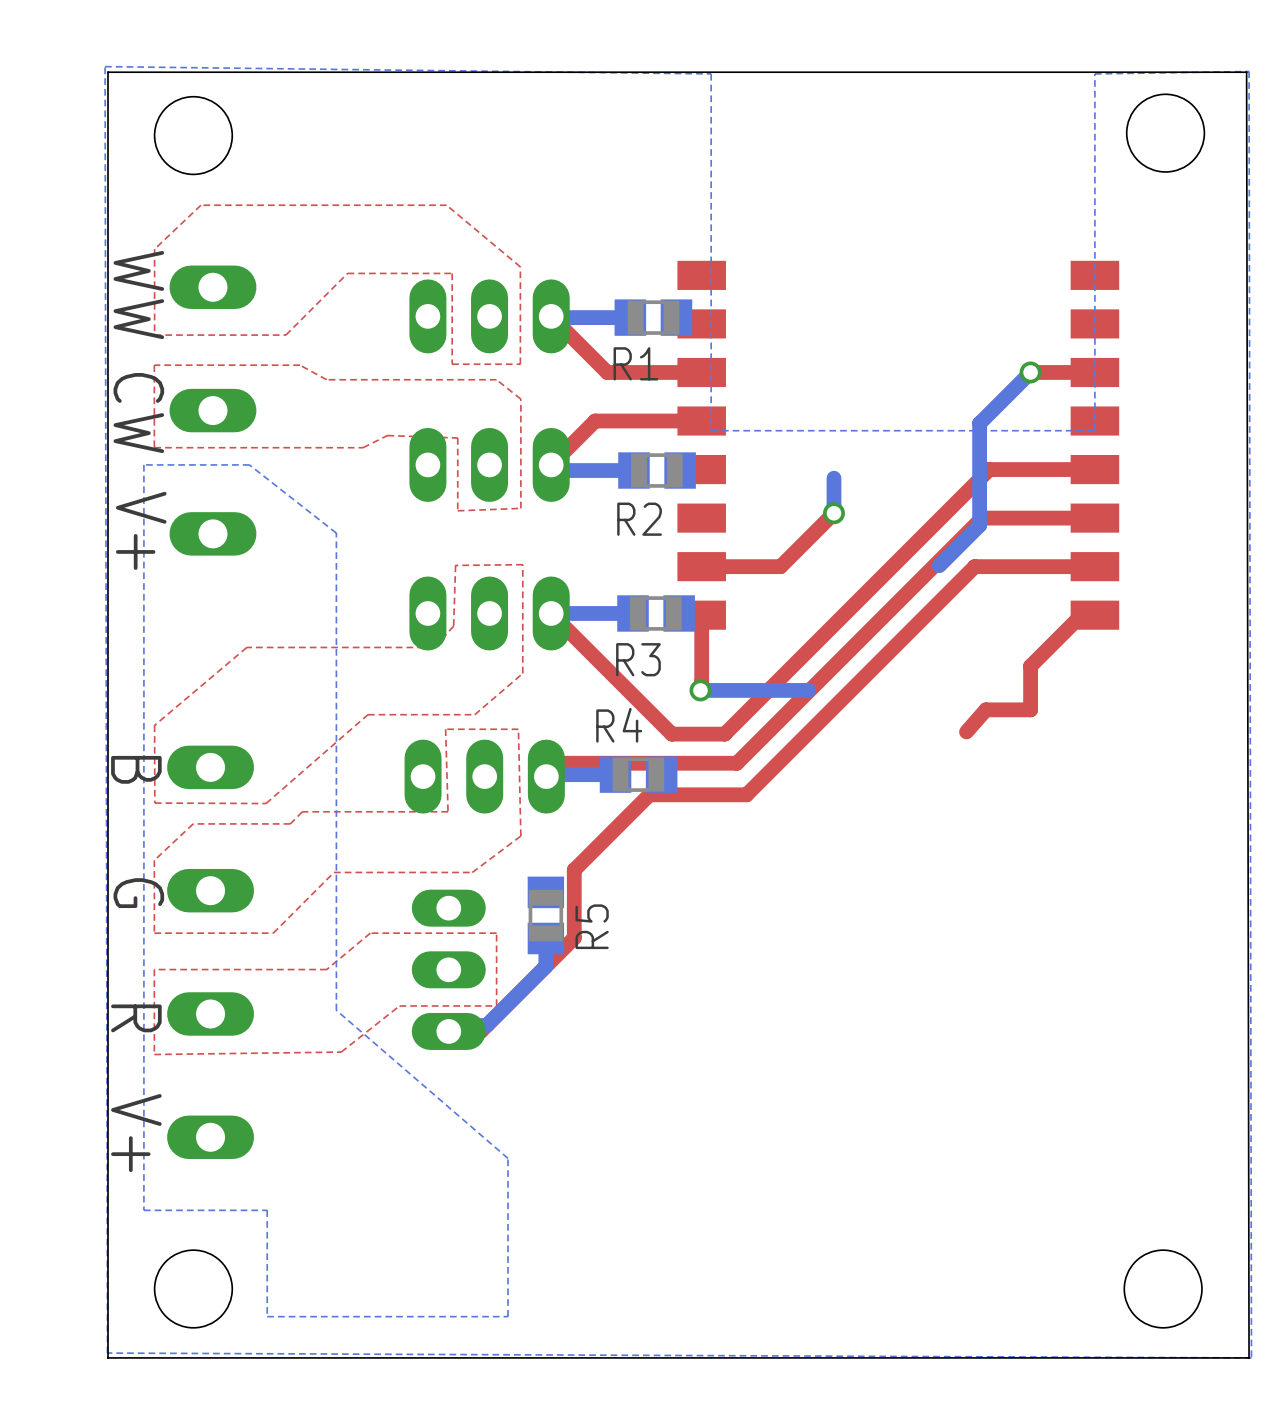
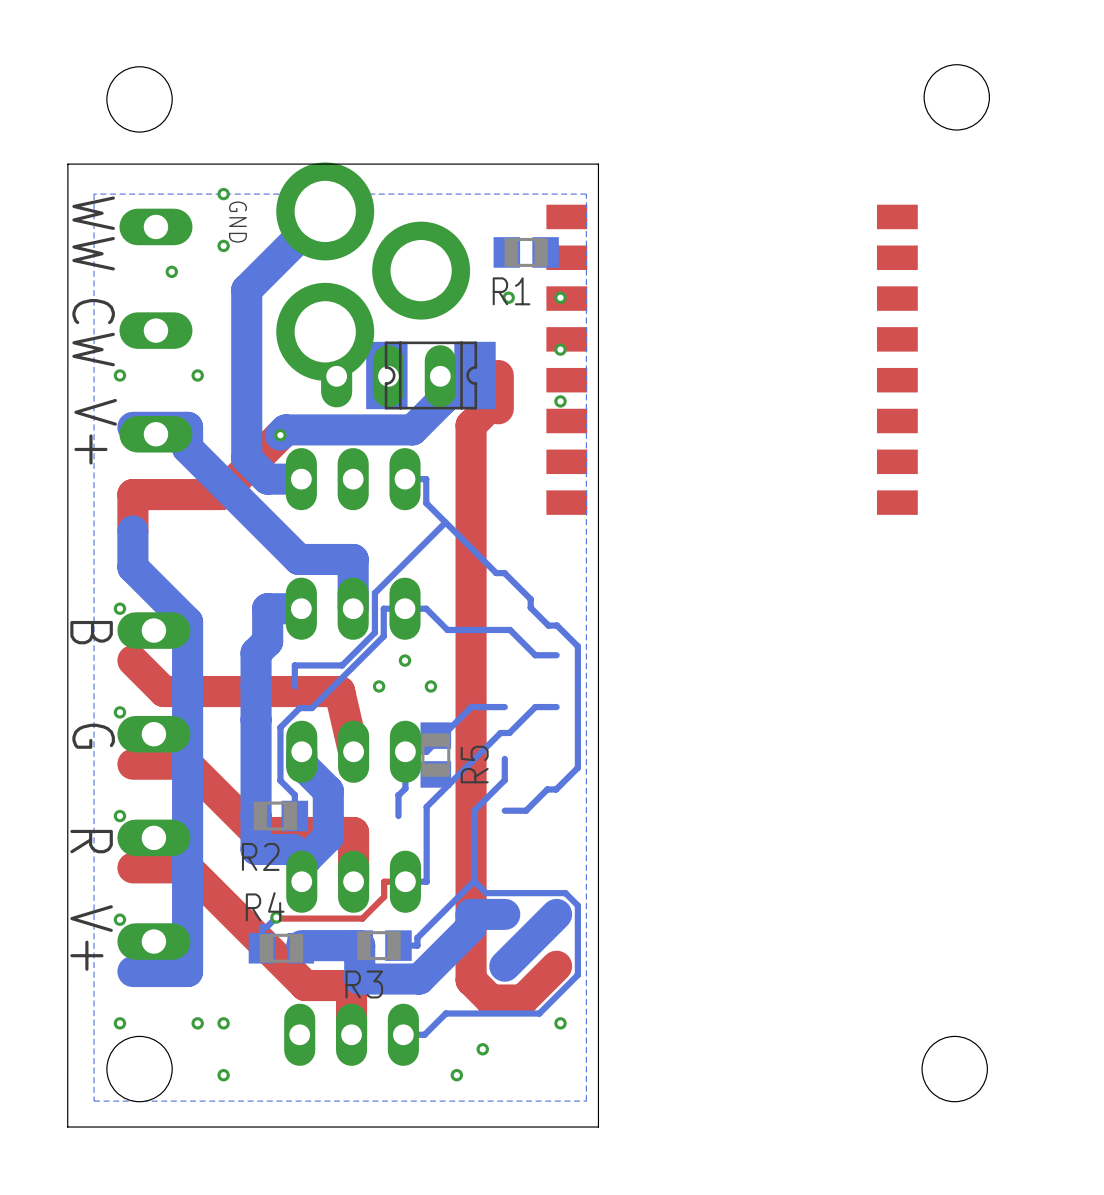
bottom zone outline: (105, 66) (107, 1353) (1251, 1357) (1249, 71) (1094, 73) (1094, 430) (711, 430) (711, 73) (105, 66) -> none
top zone outline: (446, 205) (520, 266) (520, 364) (452, 364) (452, 273) (347, 273) (285, 335) (154, 335) (154, 249) (200, 205) (446, 205) -> none
board edge: (108, 212) (108, 72) (1246, 72) (1249, 1357) (739, 1357) -> (67, 164) (598, 164) (598, 1127)
via: none -> (223, 194)
bottom zone outline: none -> (586, 194) (586, 1101) (94, 1101) (94, 194) (586, 194)
bottom track: none -> (325, 211) (246, 289) (246, 458) (267, 479) (301, 479)
text: none -> GND (237, 222)
via: none -> (223, 245)
part: (489, 316) -> none
bottom track: (551, 316) (630, 317) -> none
top track: (551, 316) (607, 372) (701, 372) -> none
via: none -> (171, 271)
part: none -> (373, 271)
top zone outline: (299, 365) (326, 379) (496, 379) (520, 399) (520, 508) (457, 510) (457, 438) (387, 435) (363, 447) (154, 447) (154, 365) (299, 365) -> none
via: none -> (508, 297)
via: none -> (560, 297)
bottom track: (1030, 372) (979, 423) (979, 525) (939, 565) -> none
via: (1030, 372) -> none
top track: (1094, 372) (1030, 372) -> none
top track: (701, 421) (595, 421) (551, 464) -> none
via: none -> (560, 349)
via: none -> (119, 375)
via: none -> (197, 375)
part: none -> (430, 375)
bottom track: none -> (475, 375) (442, 375) (442, 399) (412, 429) (285, 429) (280, 435)
top track: none -> (498, 375) (498, 408) (487, 408) (471, 425) (471, 980) (490, 1000) (522, 1000) (556, 966)
bottom zone outline: (249, 464) (336, 533) (336, 1010) (508, 1158) (508, 1316) (267, 1316) (267, 1210) (143, 1210) (143, 464) (249, 464) -> none
bottom track: (551, 464) (556, 470) (633, 470) -> none
top track: (1094, 469) (989, 469) (724, 734) (671, 734) (551, 613) -> none
R2 position: (657, 470) -> (275, 816)
bottom track: (833, 478) (833, 513) -> none
via: none -> (560, 401)
top track: (833, 513) (780, 566) (701, 566) -> none
via: (833, 513) -> none
top track: (1094, 518) (982, 518) (736, 763) (559, 763) (546, 776) -> none
bottom track: none -> (132, 427) (187, 427) (187, 448) (298, 559) (353, 559) (353, 608)
top track: none -> (280, 435) (221, 494) (132, 494) (132, 530)
via: none -> (280, 435)
top zone outline: (522, 564) (522, 673) (474, 714) (367, 714) (266, 803) (154, 803) (154, 725) (246, 647) (434, 647) (453, 626) (455, 565) (522, 564) -> none
top track: (1094, 566) (974, 566) (746, 794) (649, 794) (574, 870) (574, 938) (480, 1031) (448, 1031) -> none
bottom track: none -> (405, 479) (426, 479) (426, 503) (496, 573) (504, 573) (530, 599) (530, 607) (548, 625) (557, 625) (577, 646) (577, 767) (556, 789) (547, 789) (526, 810) (504, 810)
part position: (489, 613) -> (353, 479)
bottom track: (633, 613) (551, 613) -> none
R3 position: (656, 613) -> (379, 945)
top track: (701, 615) (700, 690) -> none
top track: (1094, 615) (1081, 615) (1030, 666) (1030, 709) (985, 709) (966, 731) -> none
bottom track: none -> (445, 522) (374, 593) (374, 632) (342, 665) (294, 665) (294, 686)
bottom track: none -> (132, 530) (132, 567) (187, 622) (187, 971) (132, 971)
via: (700, 690) -> none
bottom track: (808, 690) (700, 690) -> none
top zone outline: (518, 729) (445, 729) (448, 811) (302, 811) (290, 823) (193, 823) (154, 860) (154, 933) (273, 933) (333, 872) (472, 872) (520, 836) (518, 729) -> none
via: none -> (119, 608)
bottom track: none -> (301, 608) (267, 608) (267, 641) (256, 653) (256, 849) (292, 849) (301, 858) (306, 858) (328, 836) (328, 791) (301, 764) (301, 751)
bottom track: (615, 774) (548, 774) (546, 776) -> none
R4 position: (638, 774) -> (281, 948)
part position: (484, 776) -> (353, 608)
bottom track: none -> (556, 655) (535, 655) (510, 629) (447, 629) (426, 608) (383, 608) (383, 636) (311, 708) (299, 708) (280, 727) (280, 780) (294, 795) (294, 816)
top track: none -> (132, 660) (163, 691) (339, 691) (353, 751)
via: none -> (405, 660)
via: none -> (379, 686)
via: none -> (430, 686)
bottom track: none -> (504, 707) (471, 707) (426, 751) (405, 751) (405, 788) (398, 795) (398, 816)
bottom track: none -> (556, 707) (535, 707) (509, 732) (500, 732) (426, 806) (426, 881) (405, 881)
via: none -> (119, 712)
part: none -> (353, 751)
bottom track: none -> (504, 758) (504, 780) (474, 810) (474, 881)
top track: none -> (132, 764) (187, 764) (255, 832) (353, 832) (353, 881)
top zone outline: (496, 933) (496, 1005) (399, 1005) (341, 1052) (154, 1054) (154, 969) (326, 969) (370, 933) (496, 933) -> none
bottom track: (545, 938) (545, 966) (486, 1025) (483, 1025) (477, 1031) (448, 1031) -> none
part: (448, 969) -> none
via: none -> (119, 816)
top track: none -> (132, 867) (187, 867) (305, 985) (351, 985) (351, 1034)
bottom track: none -> (474, 881) (486, 893) (565, 893) (577, 905) (577, 975) (539, 1013) (445, 1013) (424, 1034) (403, 1034)
bottom track: none -> (474, 881) (417, 937) (417, 945) (398, 945)
part: none -> (353, 881)
top track: none -> (405, 881) (384, 881) (384, 896) (362, 918) (276, 917)
bottom track: none -> (504, 914) (471, 914) (471, 927) (419, 979) (359, 979) (359, 945) (301, 945)
bottom track: none -> (556, 914) (504, 966)
bottom track: none -> (276, 917) (266, 927) (261, 927) (261, 948)
via: none -> (276, 917)
via: none -> (119, 919)
via: none -> (119, 1023)
via: none -> (197, 1023)
via: none -> (223, 1023)
via: none -> (560, 1023)
part: none -> (351, 1034)
via: none -> (482, 1049)
via: none -> (223, 1075)
via: none -> (456, 1075)

